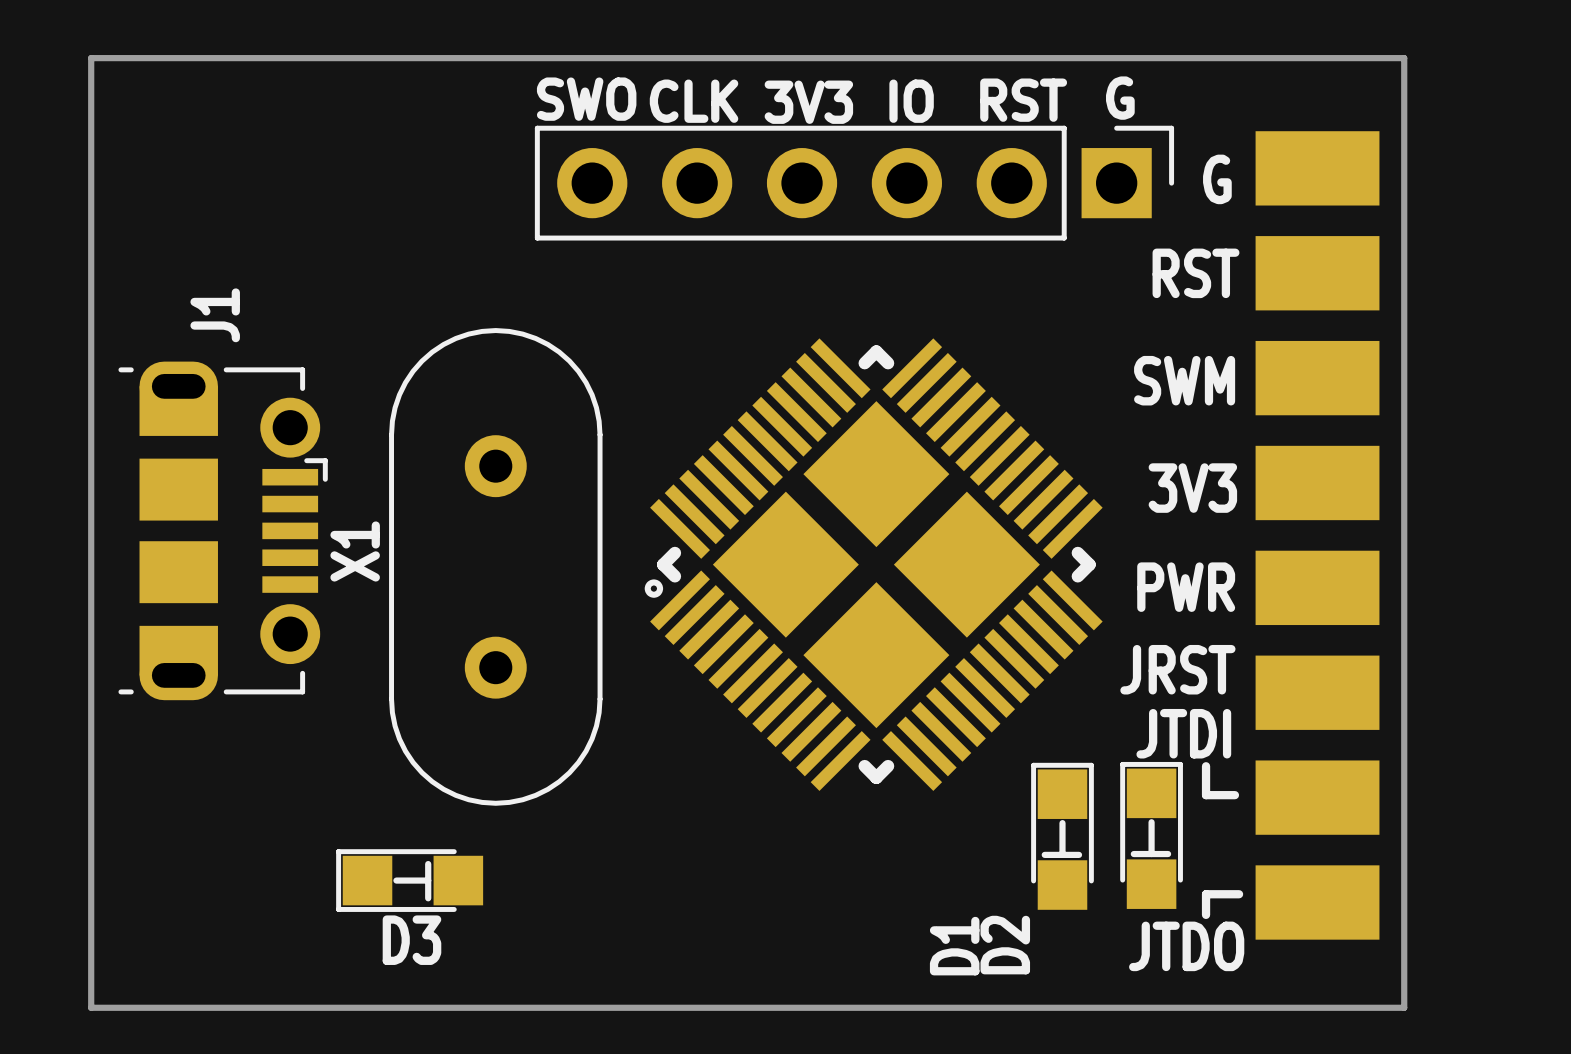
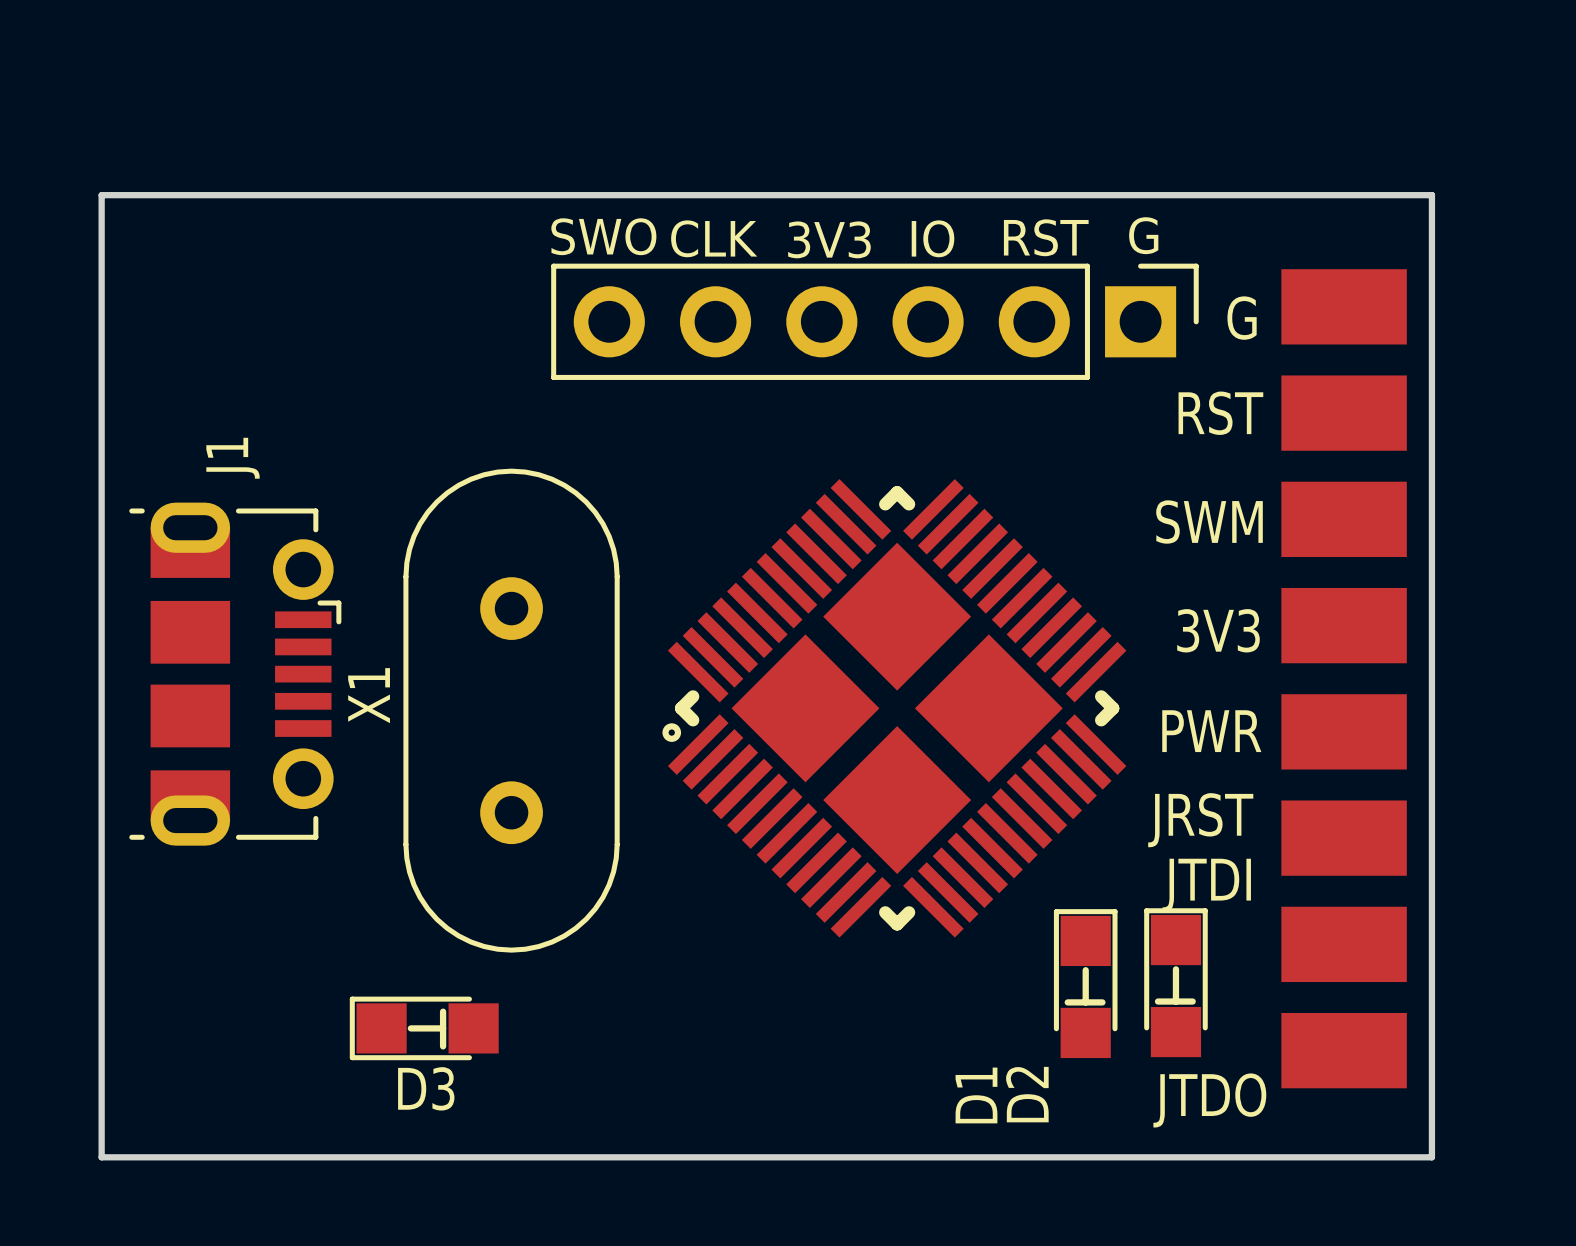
line: (1206, 766) (1206, 795) (1234, 795) -> none
line: (1239, 894) (1206, 894) (1206, 914) -> none

